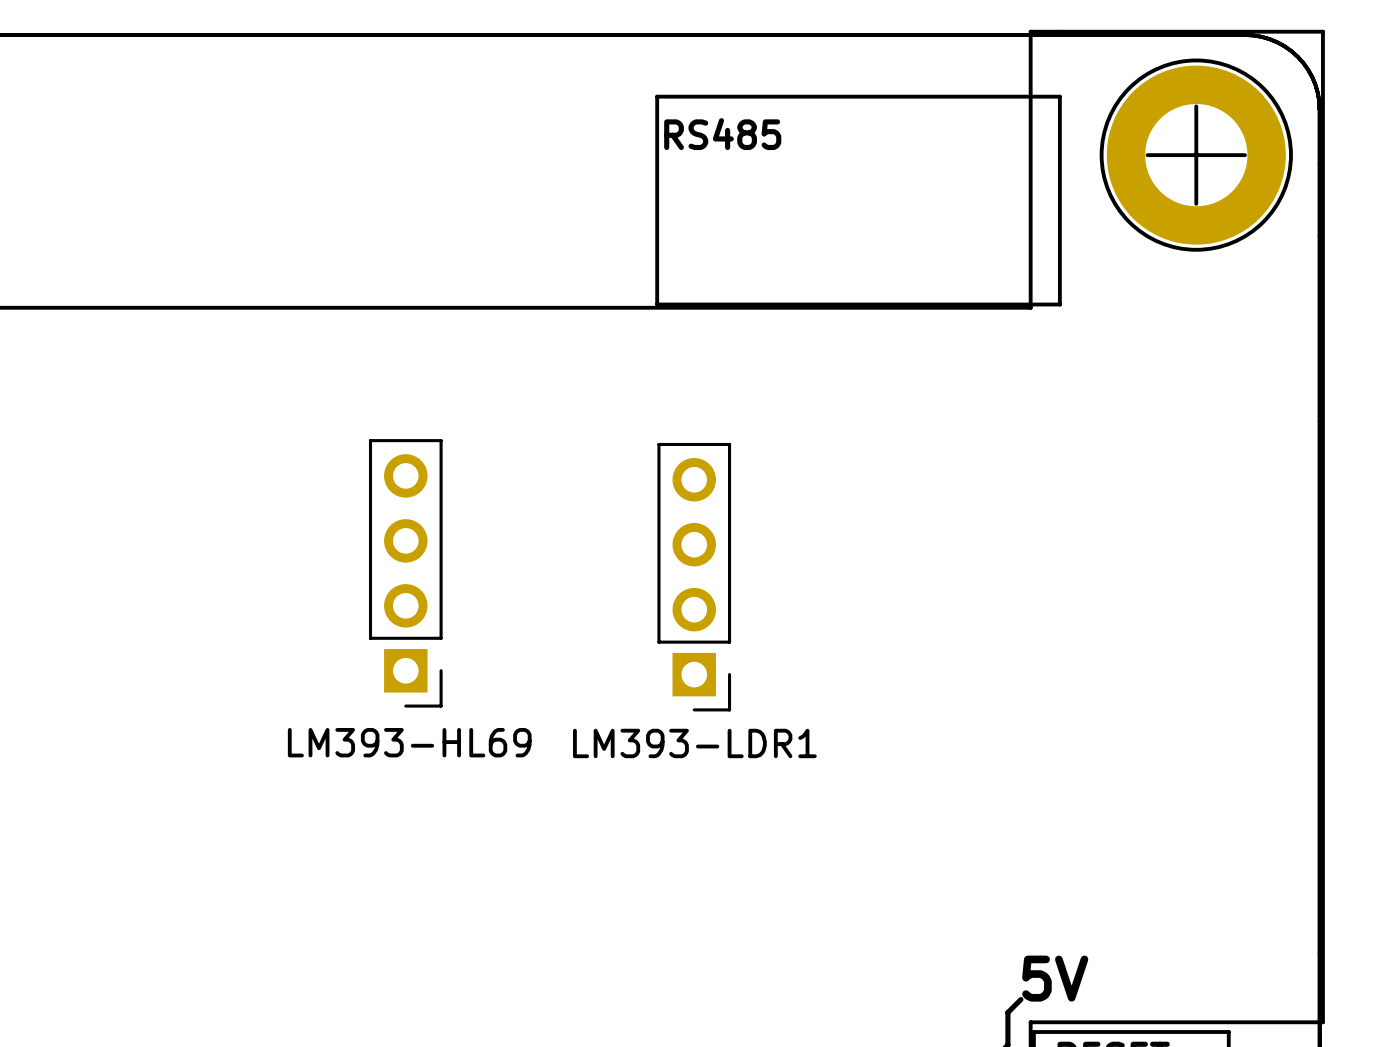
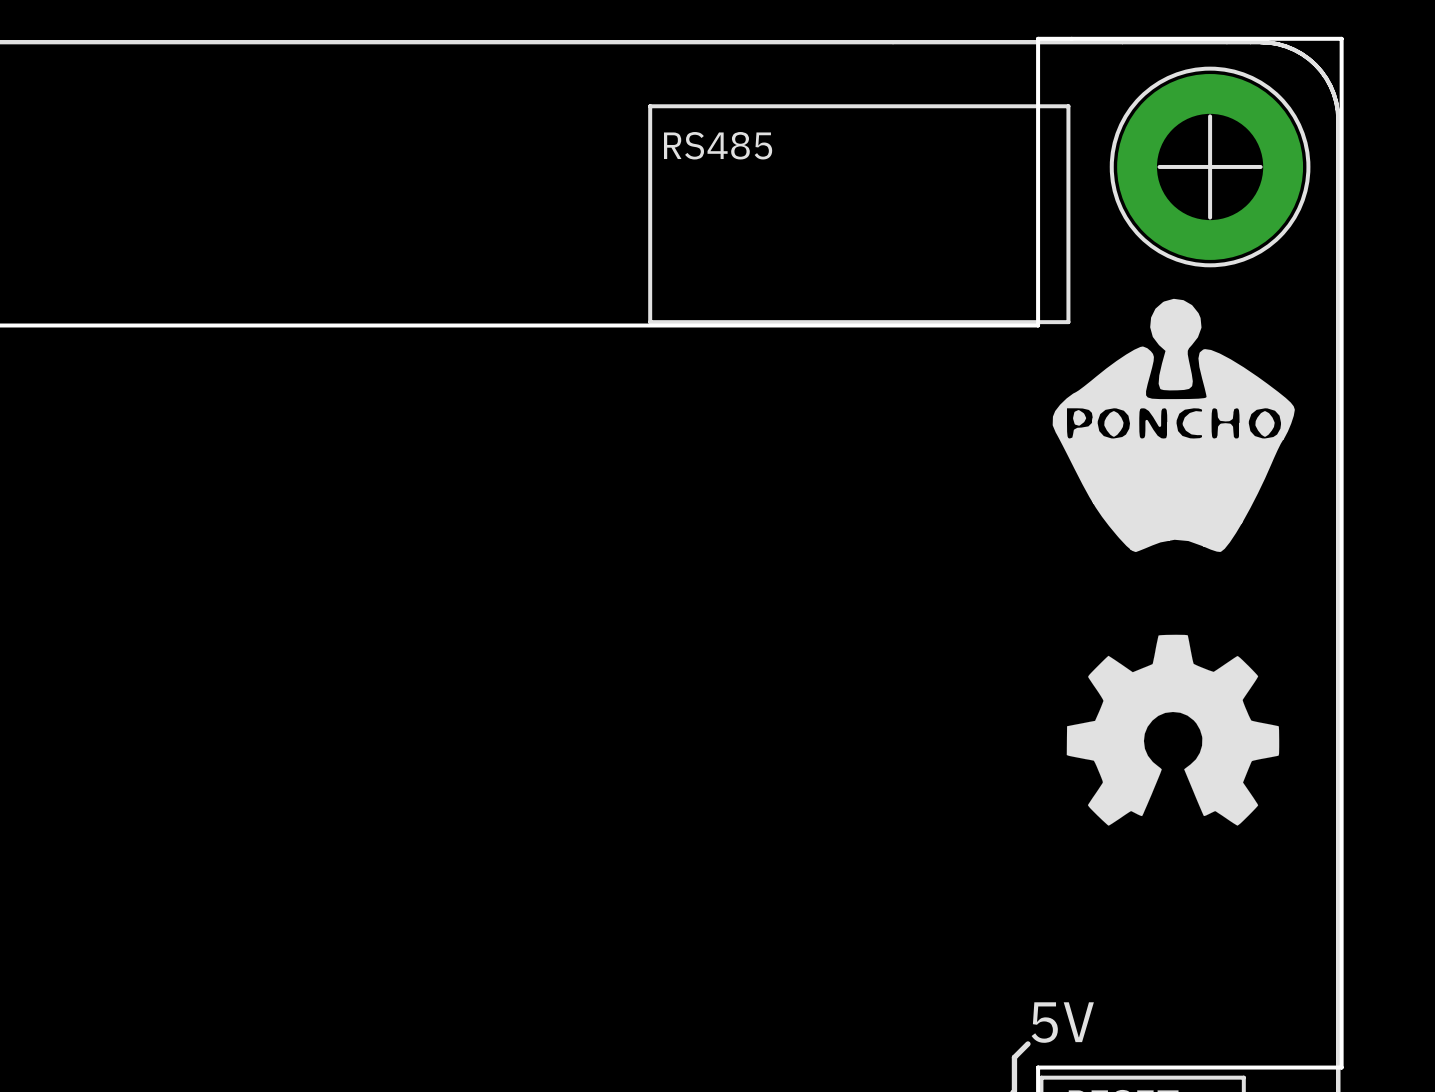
drawing: none -> [1052, 298, 1295, 553]
LM393-HL69: (405, 573) -> none
LM393-LDR1: (694, 577) -> none
drawing: none -> [1066, 634, 1280, 826]

